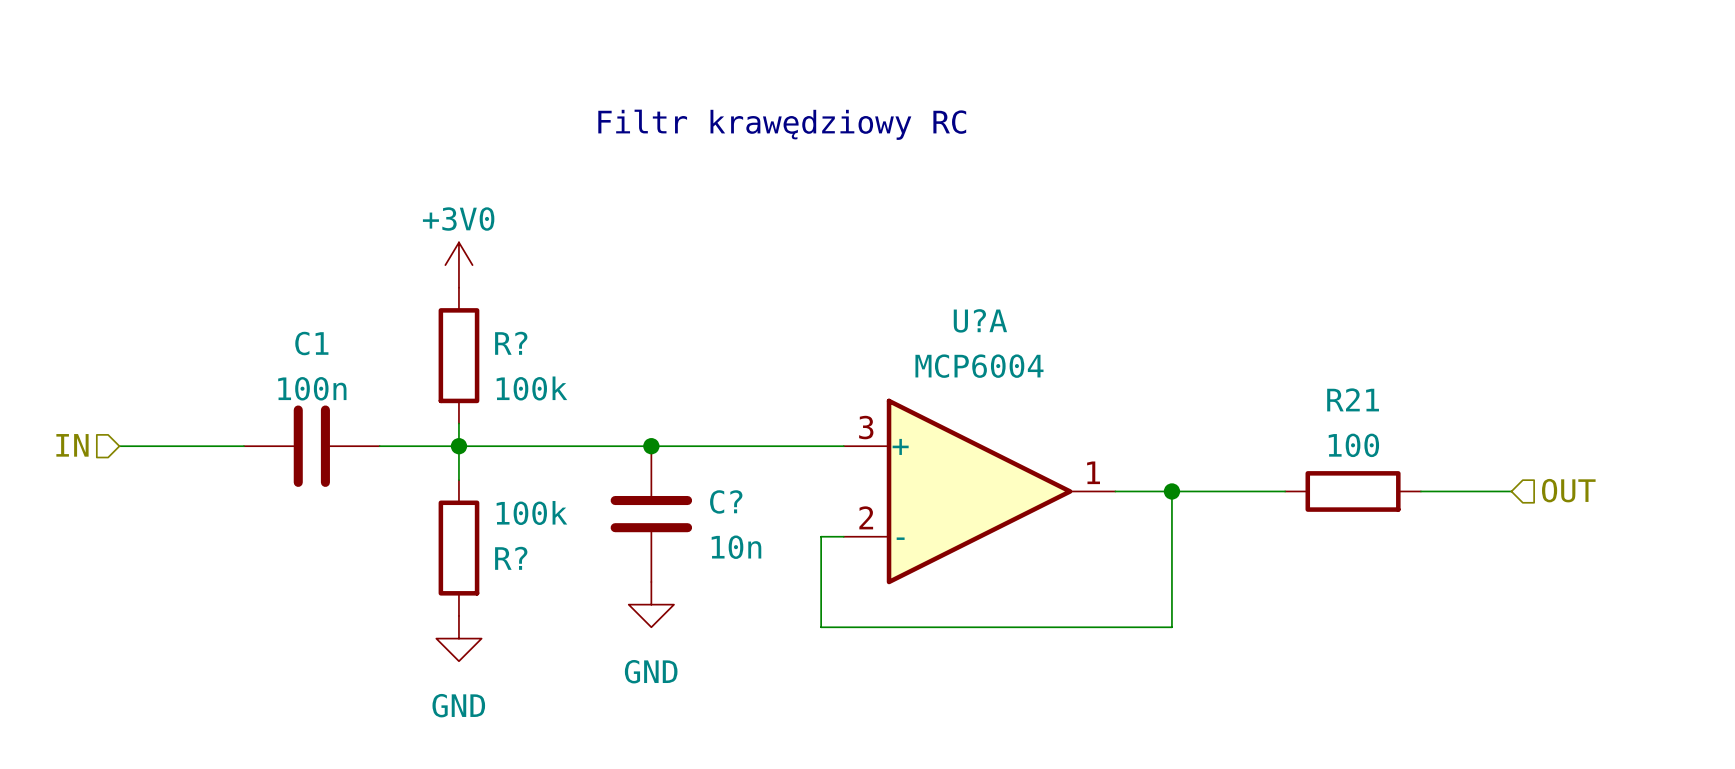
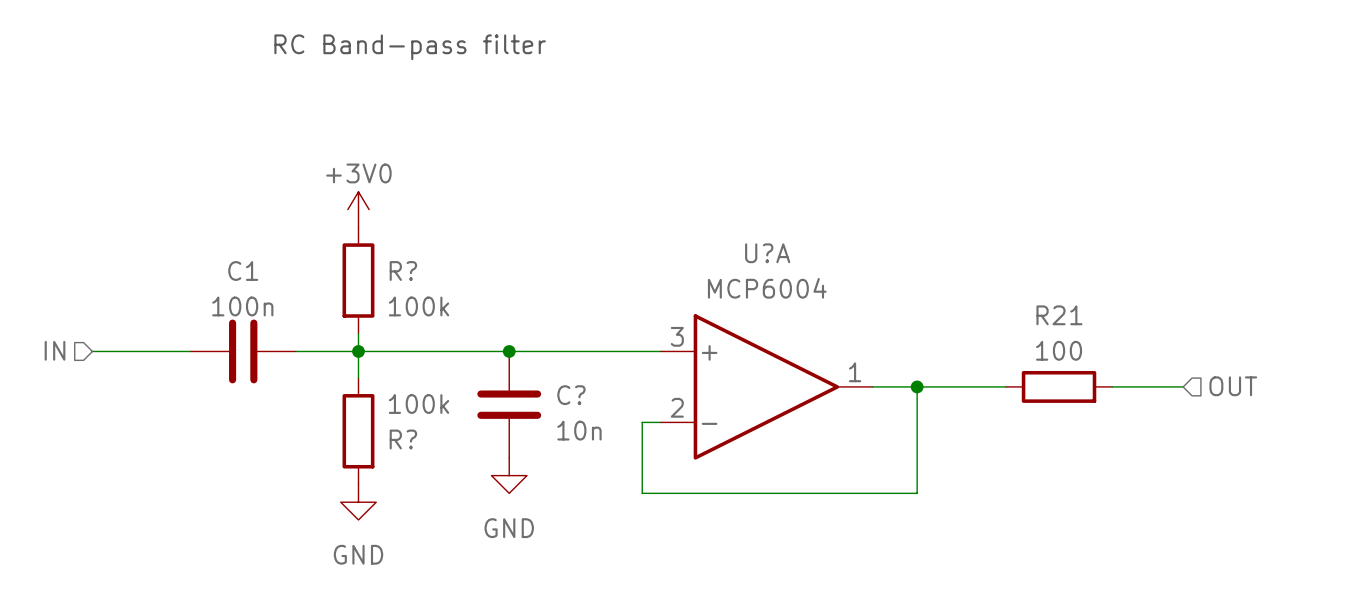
text: none -> RC Band-pass filter (410, 47)
text: Filtr krawędziowy RC (782, 124) -> none

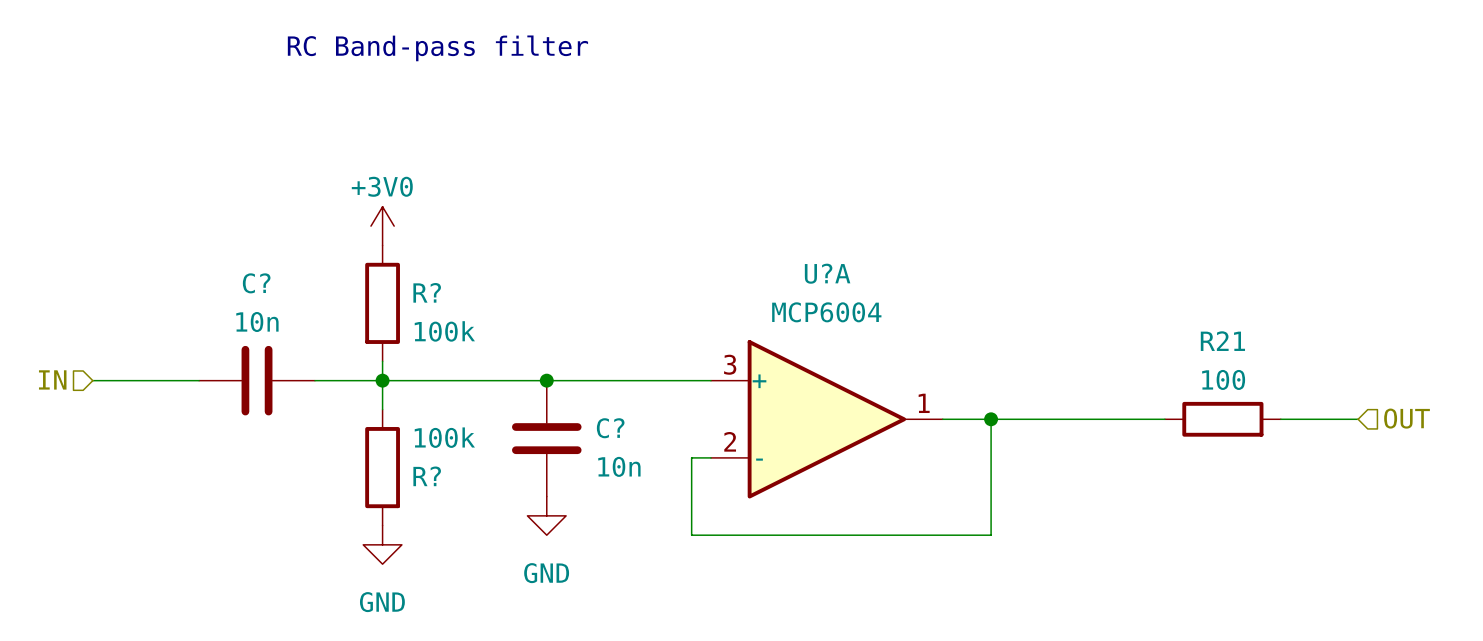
C1 name: C1 (243, 271) -> C? (256, 283)
C1 value: 100n (242, 306) -> 10n (257, 321)
wire: none -> (1087, 419) (1164, 419)
R21 position: (1059, 386) -> (1222, 419)
wire: (1112, 386) (1183, 386) -> (1358, 419) (1280, 419)
hierarchical label position: OUT (1233, 386) -> OUT (1407, 418)

